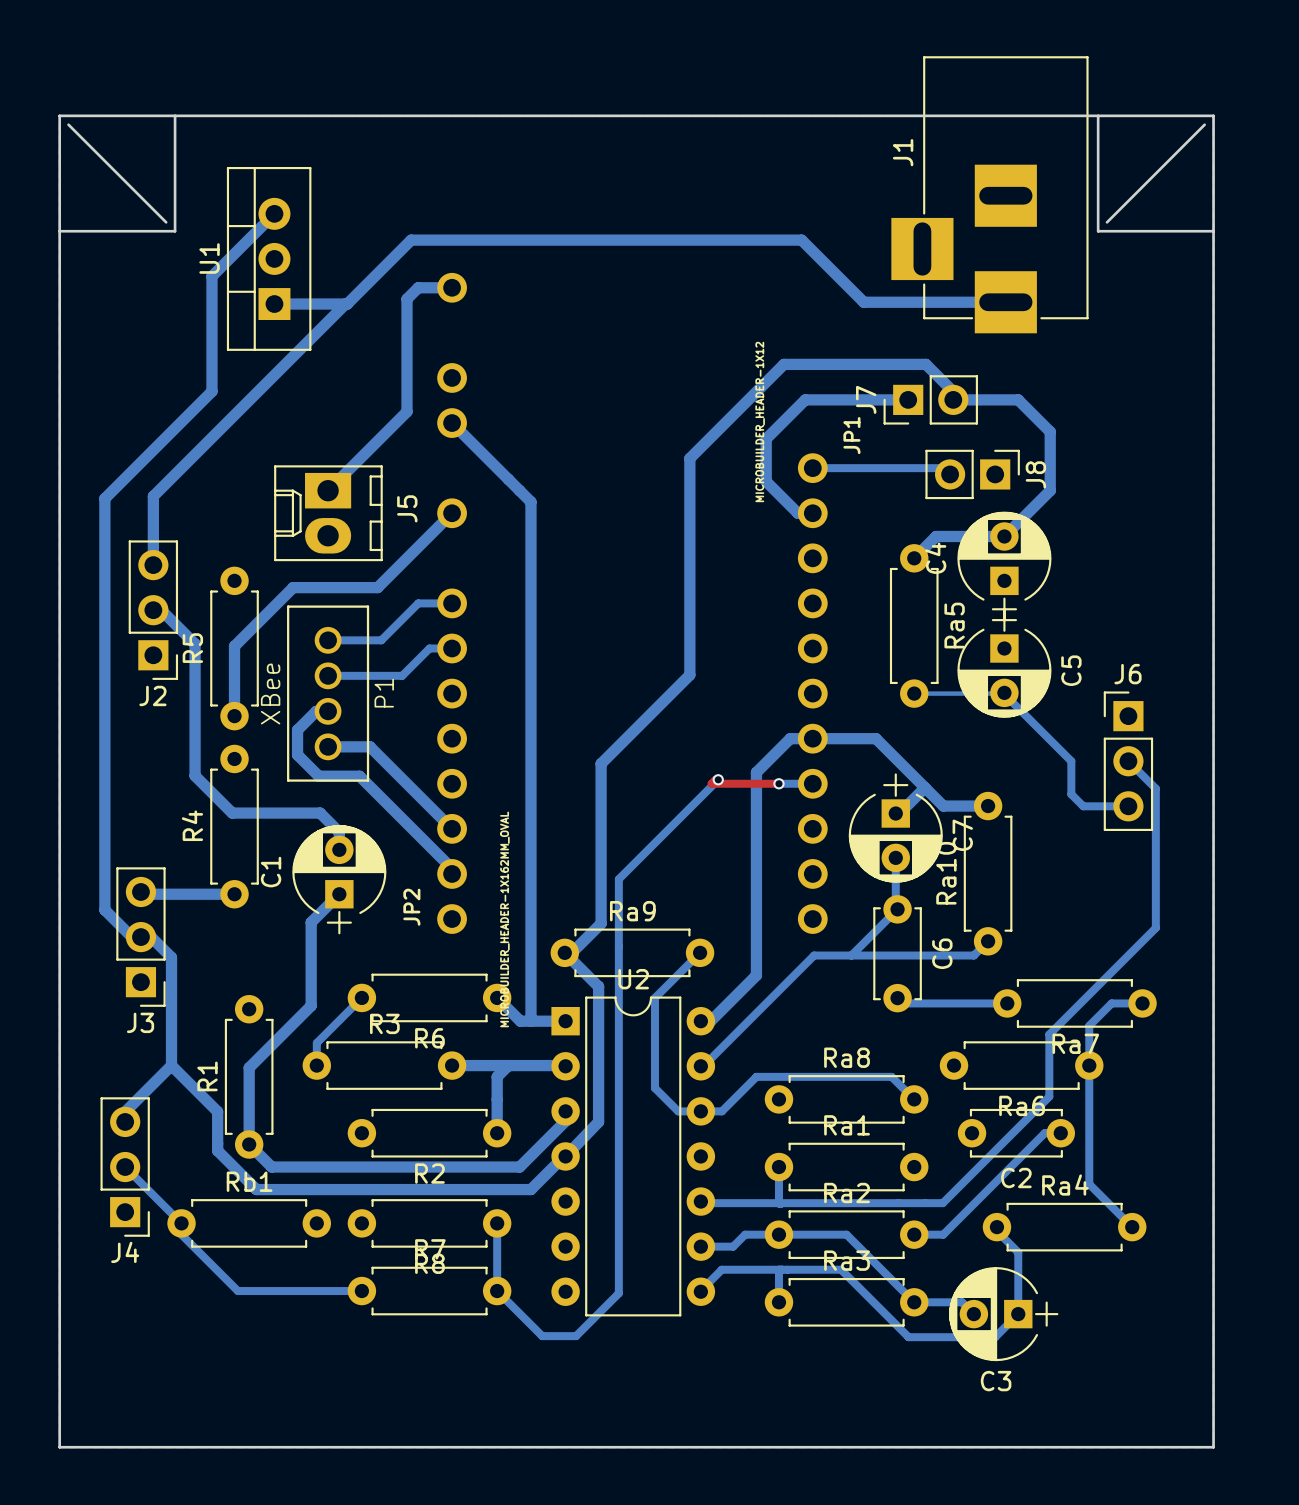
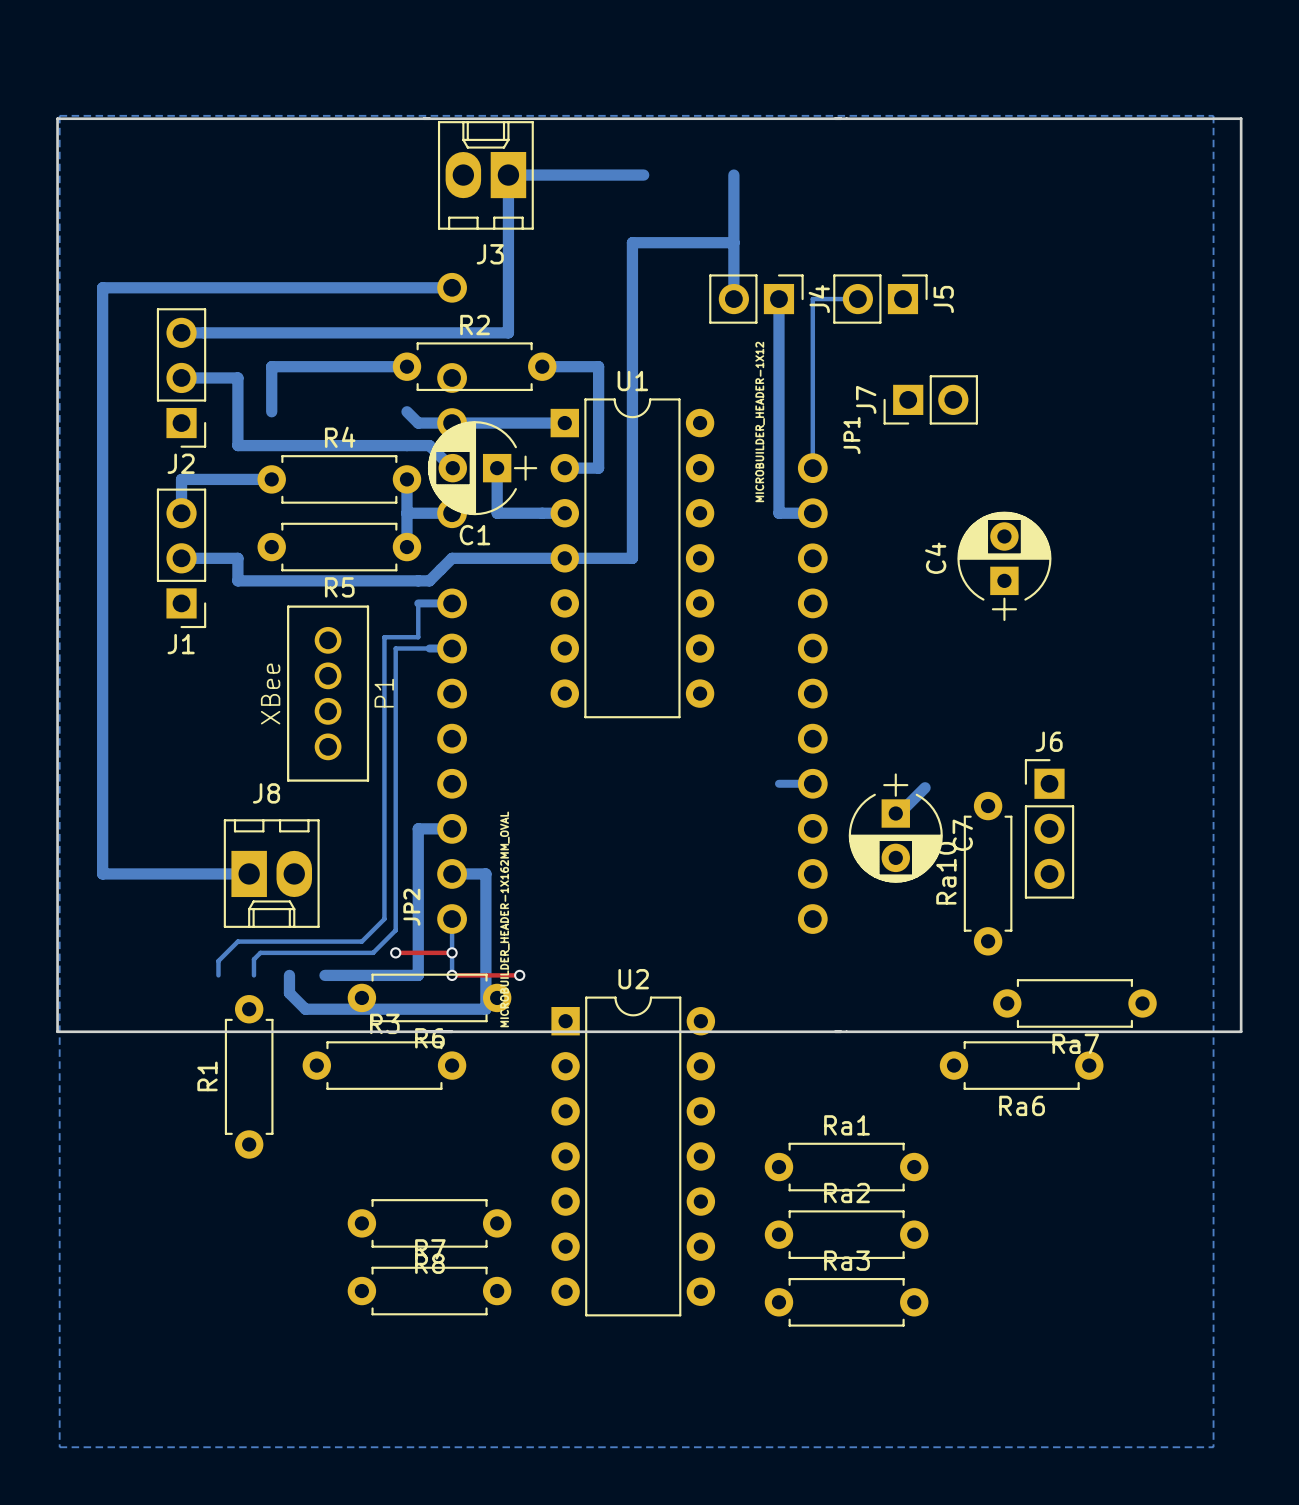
J1 footprint: [891, 56, 1089, 334] -> [156, 488, 207, 629]
board edge: (59, 115) (1213, 115) (1213, 1447) (59, 1447) (59, 115) -> (57, 118) (57, 1031) (1241, 1031) (1241, 118) (57, 118)
board edge: (175, 115) (175, 231) (59, 231) -> none
board edge: (1098, 115) (1098, 231) (1213, 231) -> none
board edge: (68, 124) (166, 222) -> none
board edge: (1204, 124) (1107, 222) -> none
J1 name position: J1 (903, 152) -> J1 (181, 644)
bottom track: none -> (508, 163) (508, 332) (181, 332)
U1 footprint: [226, 166, 312, 351] -> [550, 398, 715, 719]
bottom track: none -> (508, 175) (643, 175)
bottom track: none -> (733, 175) (733, 299)
bottom track: (274, 215) (211, 276) (211, 391) (104, 498) (104, 910) (131, 937) (151, 937) (171, 957) (171, 1065) -> none
bottom track: none -> (733, 242) (632, 242) (632, 558) (452, 558) (429, 580) (237, 580) (237, 558) (181, 558)
U1 name position: U1 (209, 258) -> U1 (632, 381)
bottom track: (418, 287) (406, 299) (406, 411) (328, 490) -> (418, 287) (102, 287) (102, 873) (249, 873)
bottom track: none -> (857, 299) (812, 299) (812, 468)
bottom track: (1005, 302) (863, 302) (801, 240) (411, 240) (347, 304) (274, 304) -> none
bottom track: (345, 304) (153, 496) (153, 565) -> none
bottom track: none -> (406, 366) (271, 366) (271, 411)
bottom track: none -> (542, 366) (598, 366) (598, 468) (564, 468)
bottom track: none -> (181, 377) (237, 377) (237, 445) (429, 445) (452, 468)
bottom track: (908, 399) (805, 399) (766, 438) (766, 481) (797, 513) -> (778, 299) (778, 513) (797, 513)
bottom track: none -> (406, 411) (418, 423) (564, 423)
bottom track: (452, 423) (530, 501) (530, 1021) -> none
J8 footprint: [925, 449, 1020, 500] -> [223, 819, 320, 928]
J5 footprint: [274, 465, 383, 562] -> [833, 274, 928, 324]
bottom track: (813, 467) (943, 468) (950, 474) -> none
bottom track: none -> (497, 468) (497, 513) (564, 513)
J8 name position: J8 (1035, 474) -> J8 (266, 793)
bottom track: none -> (271, 479) (181, 479) (181, 513)
bottom track: none -> (406, 479) (406, 547)
bottom track: (452, 513) (377, 587) (293, 587) (234, 646) (234, 716) -> (452, 513) (406, 513)
bottom track: (914, 558) (936, 536) (1004, 536) (1050, 490) (1050, 431) (1018, 399) (953, 399) (953, 391) (925, 364) (783, 364) (689, 458) (689, 675) (601, 763) (601, 923) (571, 952) (564, 952) (598, 986) (598, 1121) (530, 1189) (256, 1189) (217, 1150) (217, 1111) (171, 1065) -> none
bottom track: (418, 603) (381, 640) (328, 640) -> (418, 603) (418, 637) (384, 637) (384, 919) (361, 941) (237, 941) (218, 961) (218, 975)
bottom track: (153, 610) (161, 610) (195, 643) (195, 775) (232, 813) (320, 813) (339, 832) (339, 849) -> none
J2 position: (153, 610) -> (181, 377)
Ra5: (914, 625) -> none
R5 name position: R5 (192, 648) -> R5 (339, 587)
R5 rotation: 0° (234, 648) -> 90° clockwise (339, 547)
R5 position: (234, 648) -> (339, 547)
bottom track: (429, 648) (402, 675) (328, 675) -> (429, 648) (395, 648) (395, 930) (373, 952) (260, 952) (253, 959) (253, 975)
C5: (1004, 663) -> none
bottom track: (914, 693) (1003, 693) (1071, 761) (1071, 794) (1083, 806) (1128, 806) -> none
bottom track: (328, 711) (316, 711) (297, 730) (297, 754) (318, 776) (359, 776) (452, 868) (452, 873) -> (289, 975) (289, 993) (305, 1009) (485, 1009) (485, 873) (452, 873)
bottom track: (328, 746) (370, 746) (452, 828) -> (324, 975) (418, 975) (418, 828) (452, 828)
J6 position: (1128, 761) -> (1049, 828)
bottom track: (1135, 761) (1128, 761) (1155, 788) (1155, 928) (1049, 1034) (1049, 1096) (942, 1203) (702, 1203) (700, 1201) -> none
bottom track: (718, 779) (618, 879) (618, 1293) (576, 1336) (542, 1336) (497, 1291) (497, 1223) -> none
top track: (718, 779) (711, 783) (778, 783) -> none
via: (718, 779) -> none
via: (778, 783) -> none
bottom track: (988, 806) (943, 806) (875, 738) (790, 738) (756, 772) (756, 975) (710, 1021) (700, 1021) -> none
R4 rotation: 0° (234, 826) -> 90° clockwise (339, 479)
R4 position: (234, 826) -> (339, 479)
bottom track: (895, 857) (895, 911) (851, 955) -> none
J3 footprint: [116, 867, 166, 1007] -> [437, 121, 534, 230]
C1 rotation: 0° (339, 879) -> 90° counterclockwise (482, 468)
C1 position: (339, 879) -> (482, 468)
bottom track: (140, 891) (143, 894) (234, 894) -> none
bottom track: (339, 894) (311, 922) (311, 1005) (249, 1067) (249, 1144) (271, 1167) (519, 1167) (565, 1121) (564, 1111) -> none
bottom track: none -> (452, 919) (452, 975)
bottom track: (988, 941) (973, 955) (814, 955) (703, 1066) (700, 1066) -> none
top track: none -> (395, 952) (452, 952)
via: none -> (395, 952)
via: none -> (452, 952)
Ra9: (632, 952) -> none
bottom track: (700, 952) (654, 997) (654, 1088) (678, 1111) (721, 1111) (756, 1076) (891, 1076) (914, 1099) -> none
C6: (897, 953) -> none
top track: none -> (452, 975) (519, 975)
via: none -> (452, 975)
via: none -> (519, 975)
bottom track: (361, 997) (316, 1043) (316, 1065) -> none
bottom track: (497, 997) (520, 1021) (565, 1021) -> none
bottom track: (897, 998) (902, 1003) (1007, 1003) -> none
bottom track: (1142, 1003) (1111, 1003) (1089, 1025) (1089, 1184) (1132, 1227) -> none
bottom track: (171, 1065) (125, 1111) (125, 1121) -> none
bottom track: (452, 1065) (565, 1066) -> none
bottom track: (507, 1065) (497, 1076) (497, 1133) -> none
J4 footprint: [100, 1097, 150, 1237] -> [709, 274, 804, 324]
Ra8: (846, 1099) -> none
R2 position: (429, 1133) -> (474, 366)
C2: (1016, 1133) -> none
bottom track: (1060, 1133) (1044, 1133) (943, 1234) (914, 1234) -> none
bottom track: (125, 1167) (181, 1223) (181, 1234) (237, 1291) (361, 1291) -> none
bottom track: (778, 1167) (780, 1203) -> none
R2 name position: R2 (429, 1173) -> R2 (475, 325)
Rb1: (249, 1223) -> none
bottom track: (991, 1225) (1018, 1252) (1018, 1314) (995, 1337) (908, 1337) (841, 1269) (721, 1269) (700, 1291) -> none
Ra4: (1064, 1227) -> none
bottom track: (700, 1246) (733, 1246) (745, 1234) (846, 1234) (914, 1302) (962, 1302) (973, 1314) -> none
J4 name position: J4 (125, 1252) -> J4 (819, 299)
bottom track: (778, 1269) (778, 1302) -> none
C3: (1003, 1314) -> none

